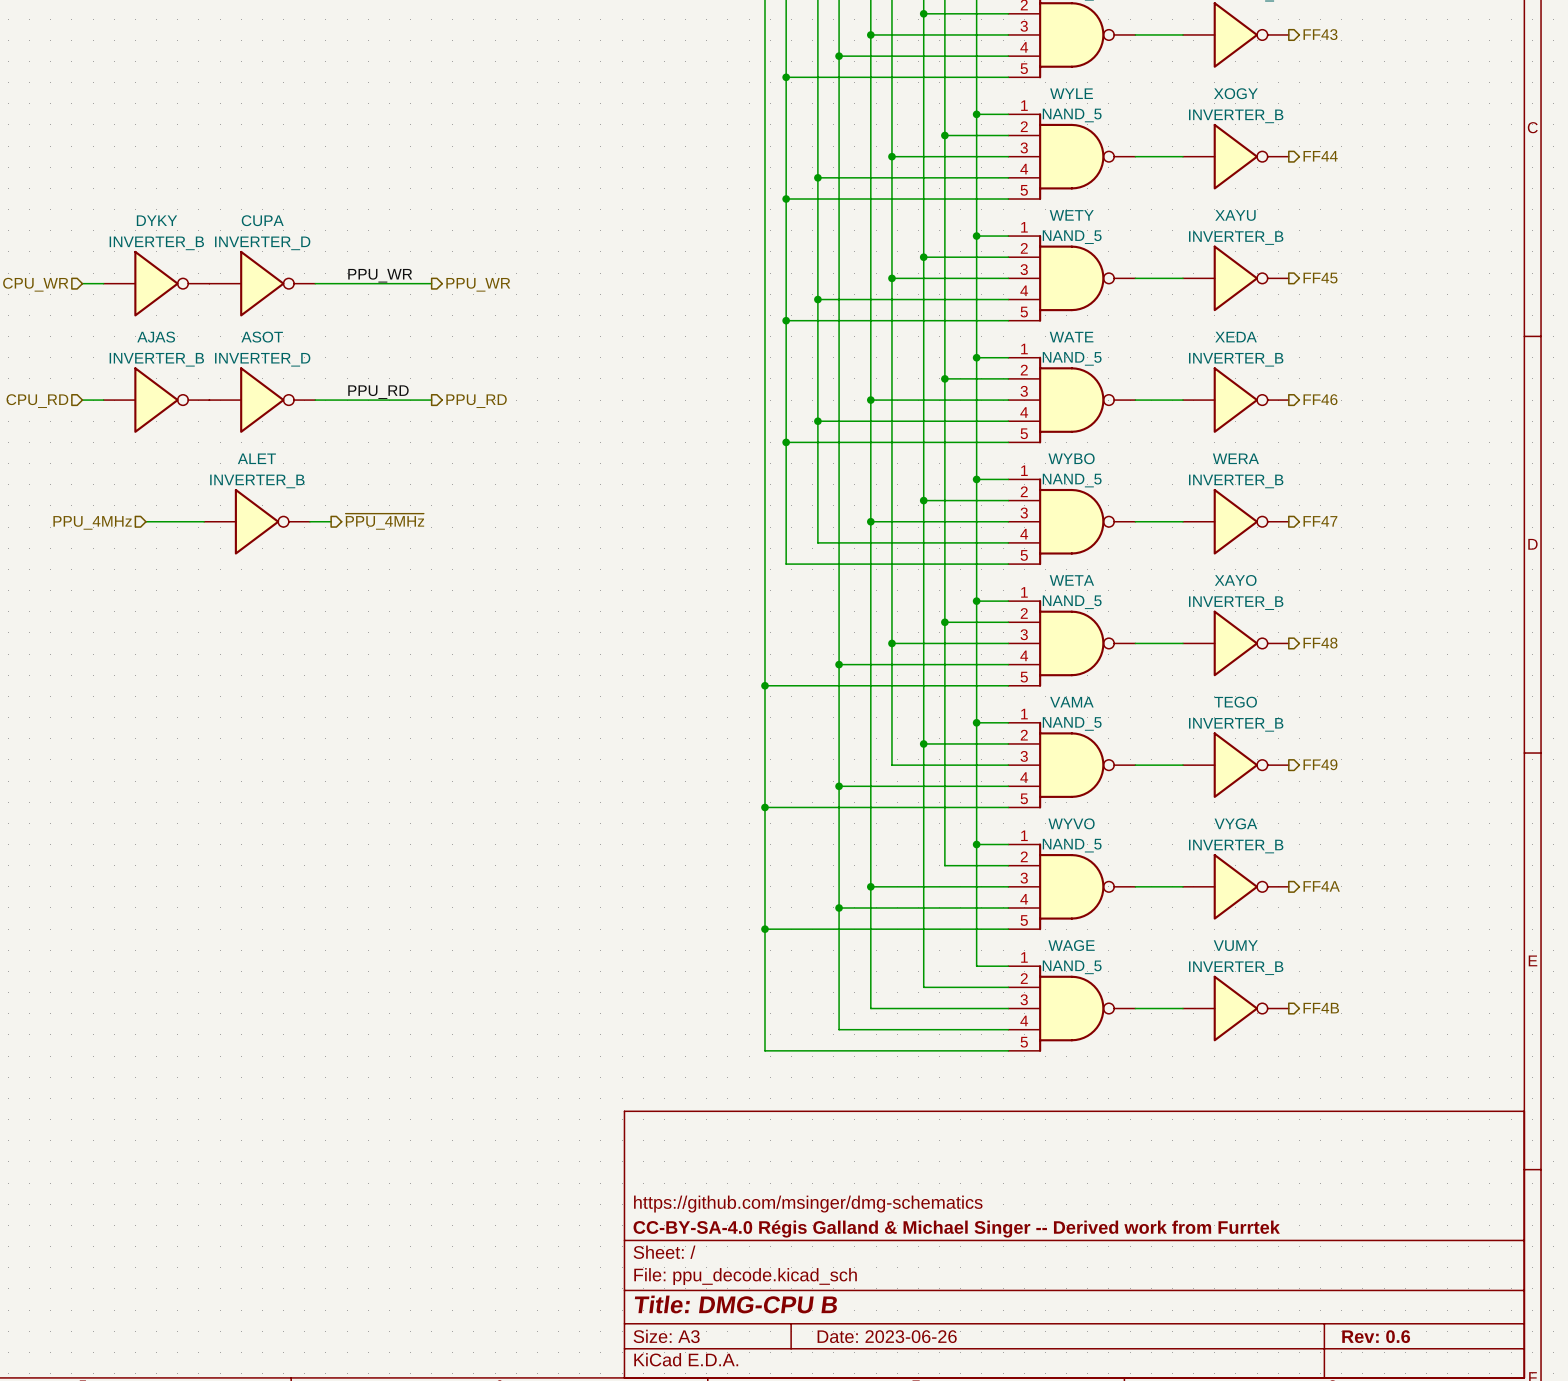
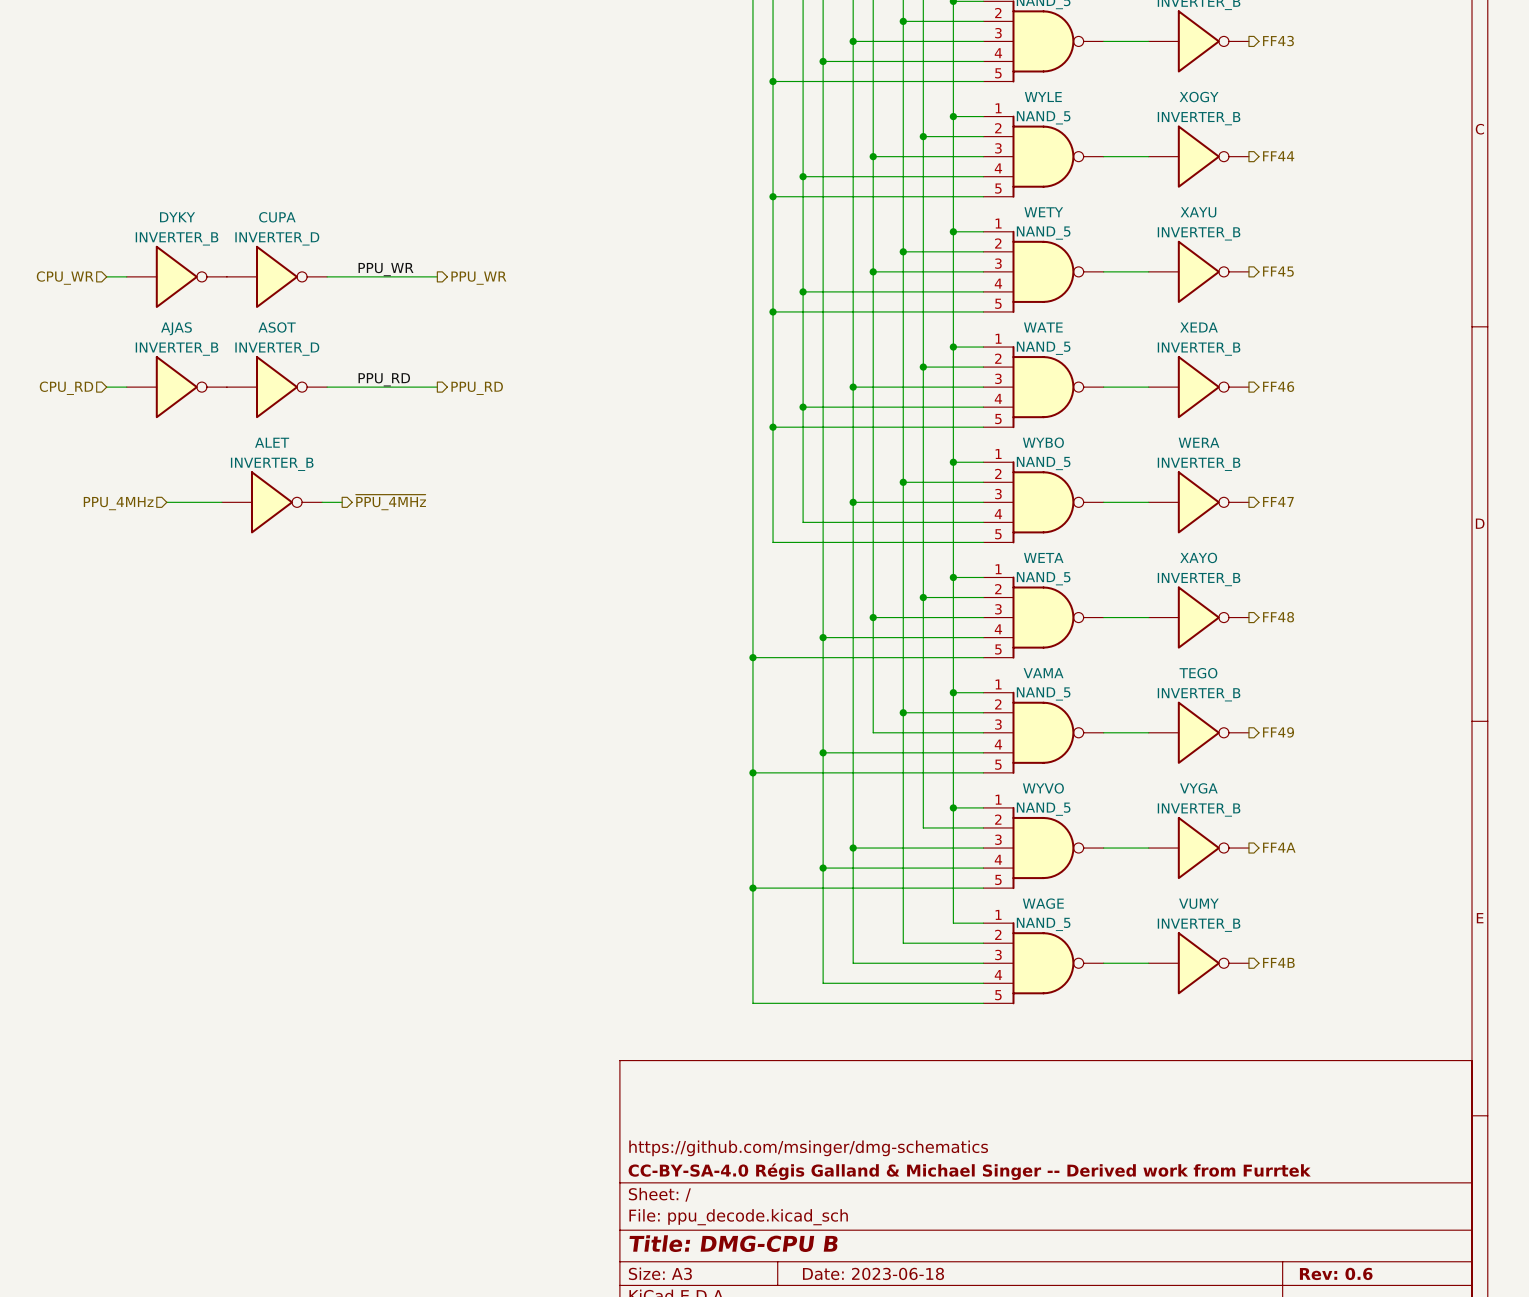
title block: Date: 2023-06-26 (887, 1336) -> Date: 2023-06-18 (873, 1273)

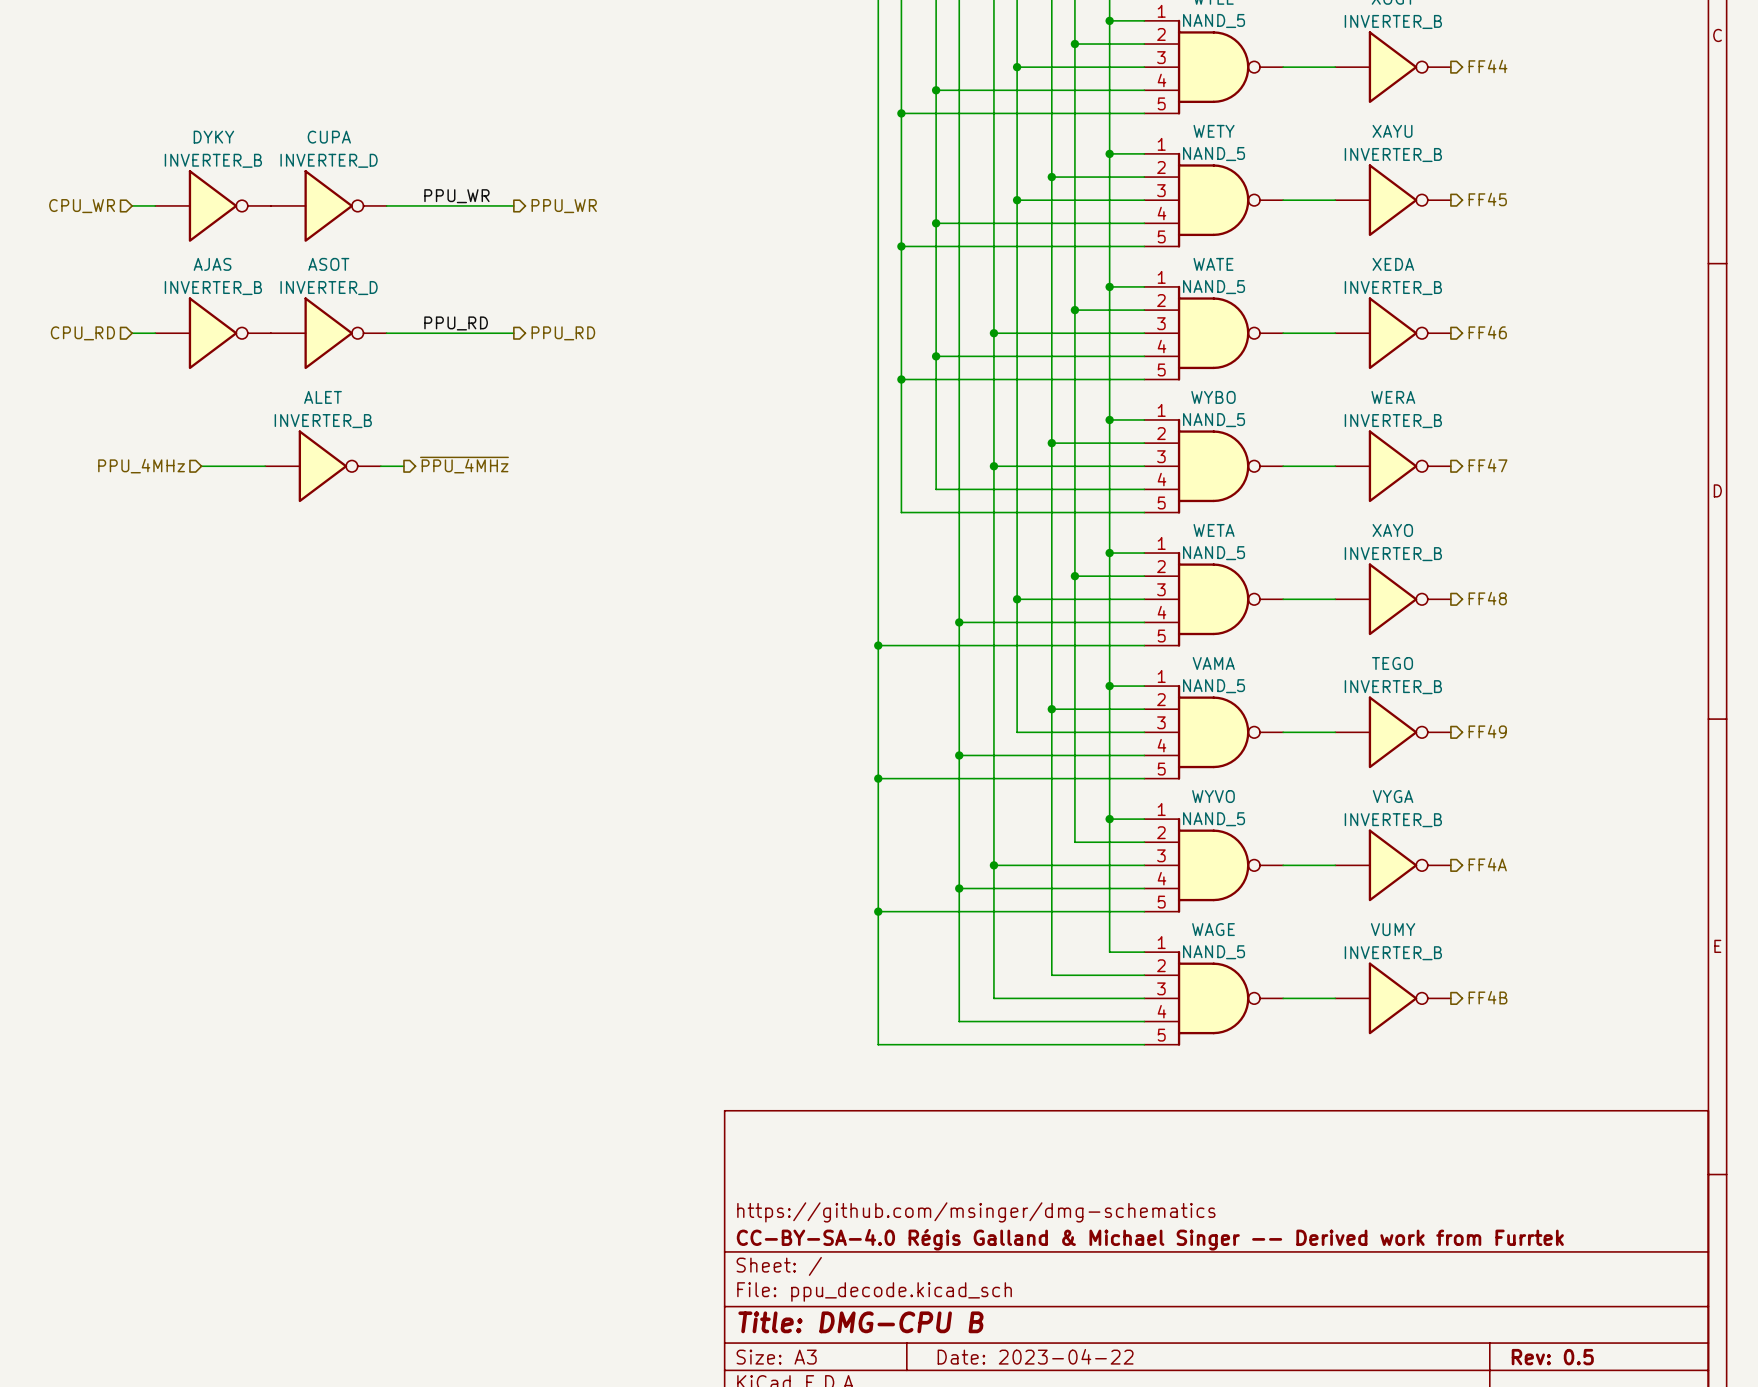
title block: Date: 2023-06-18 (873, 1273) -> Date: 2023-04-22 (1035, 1356)
title block: Rev: 0.6 (1336, 1273) -> Rev: 0.5 (1552, 1357)

